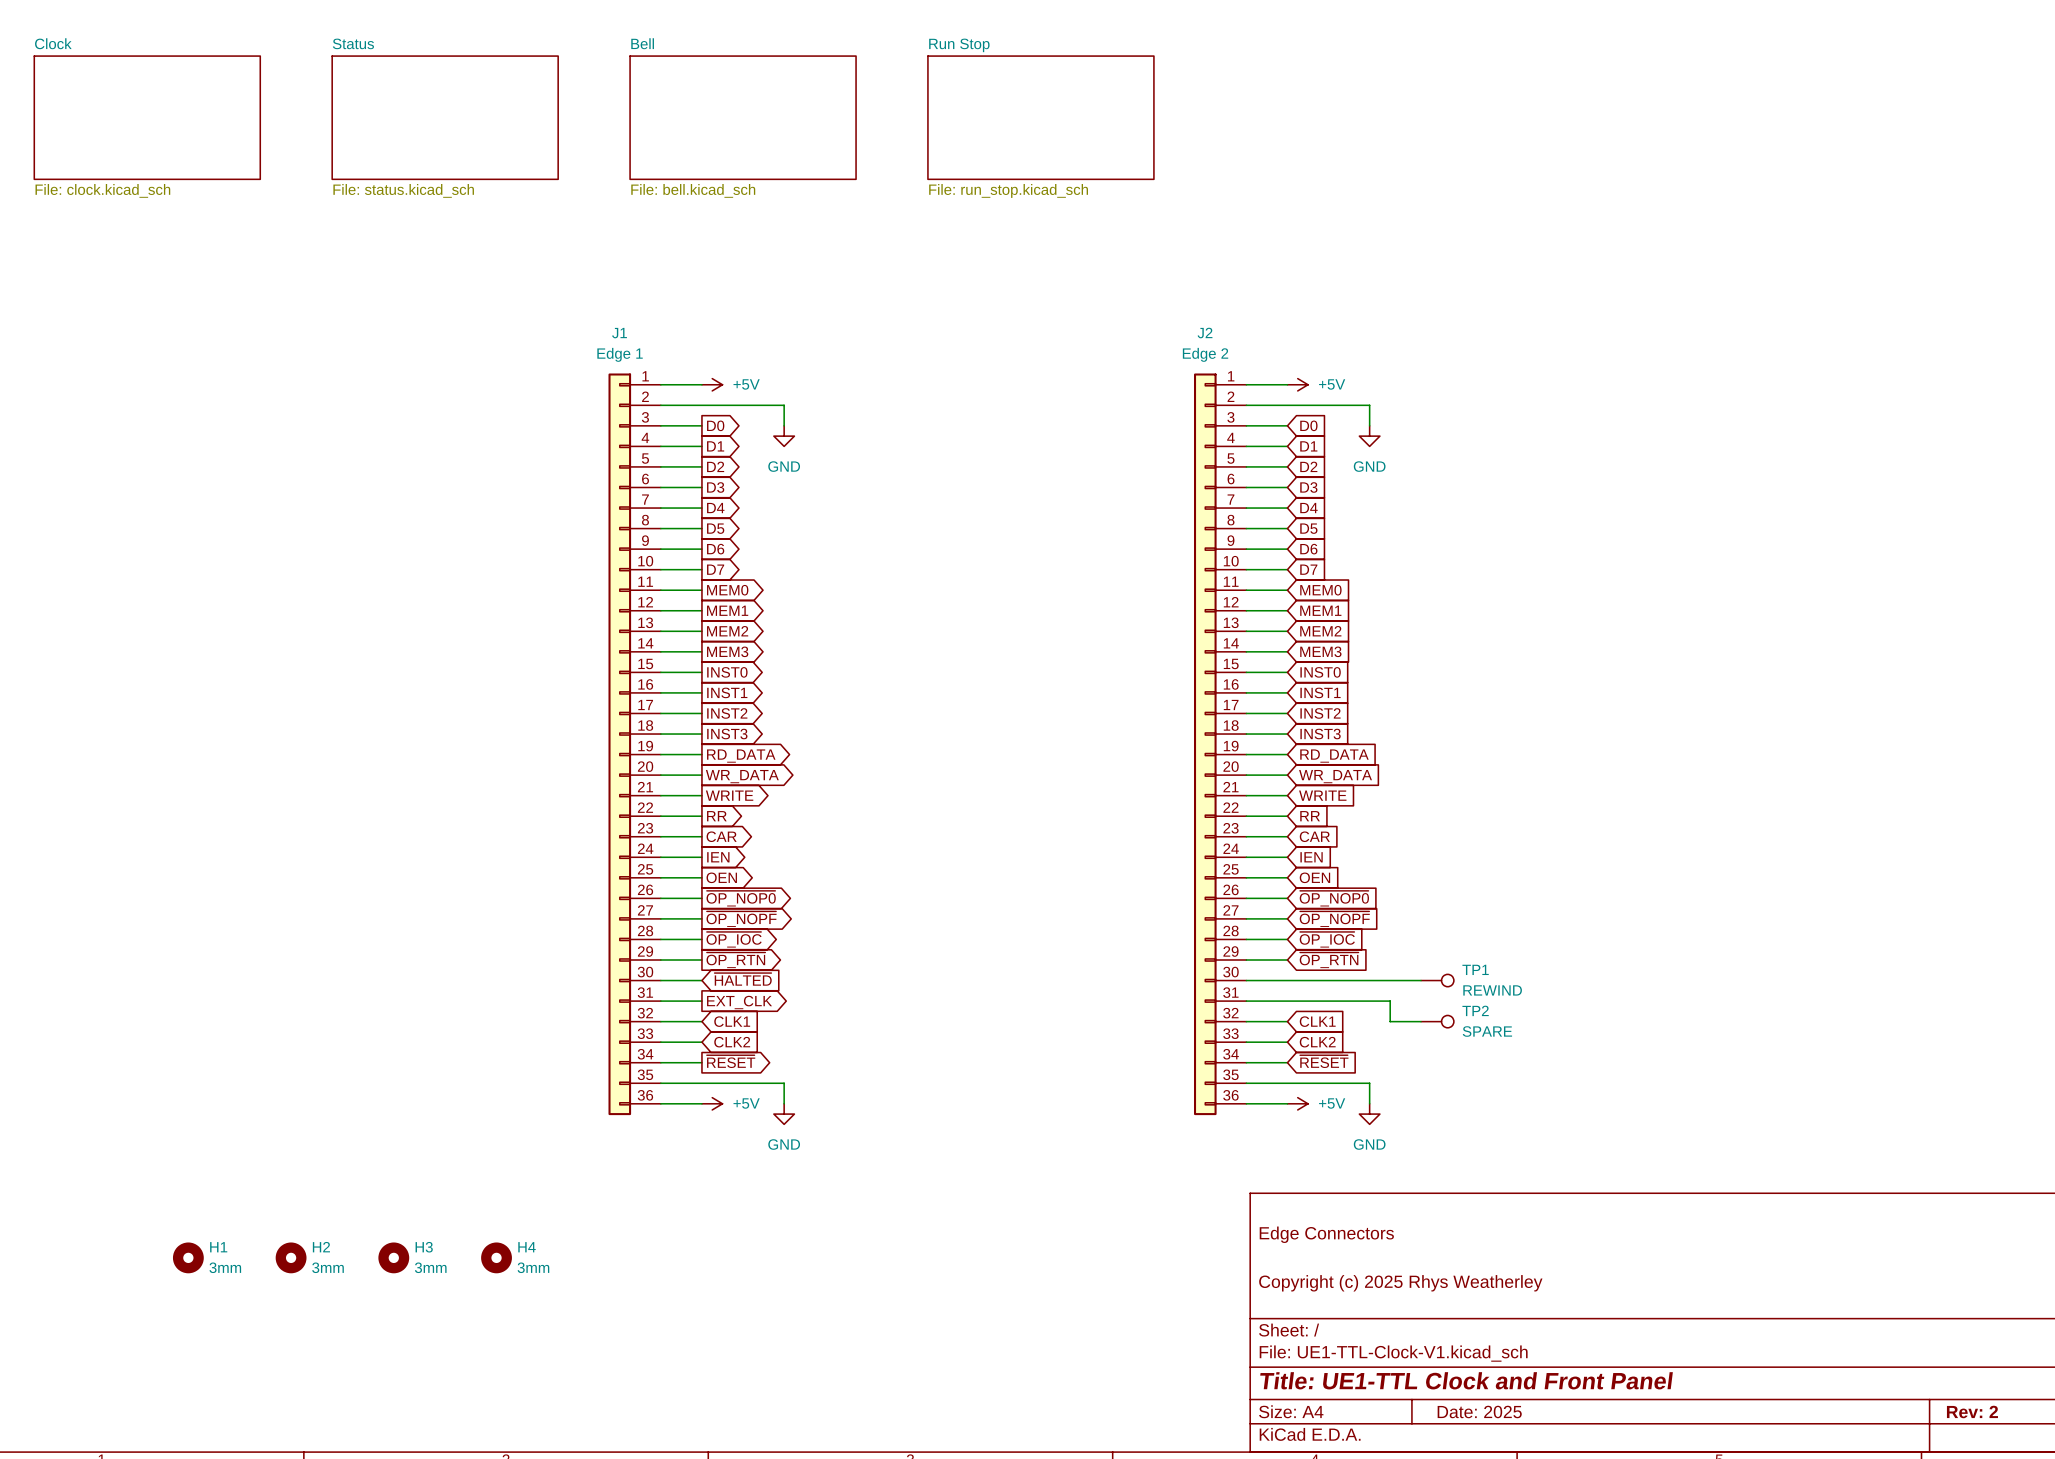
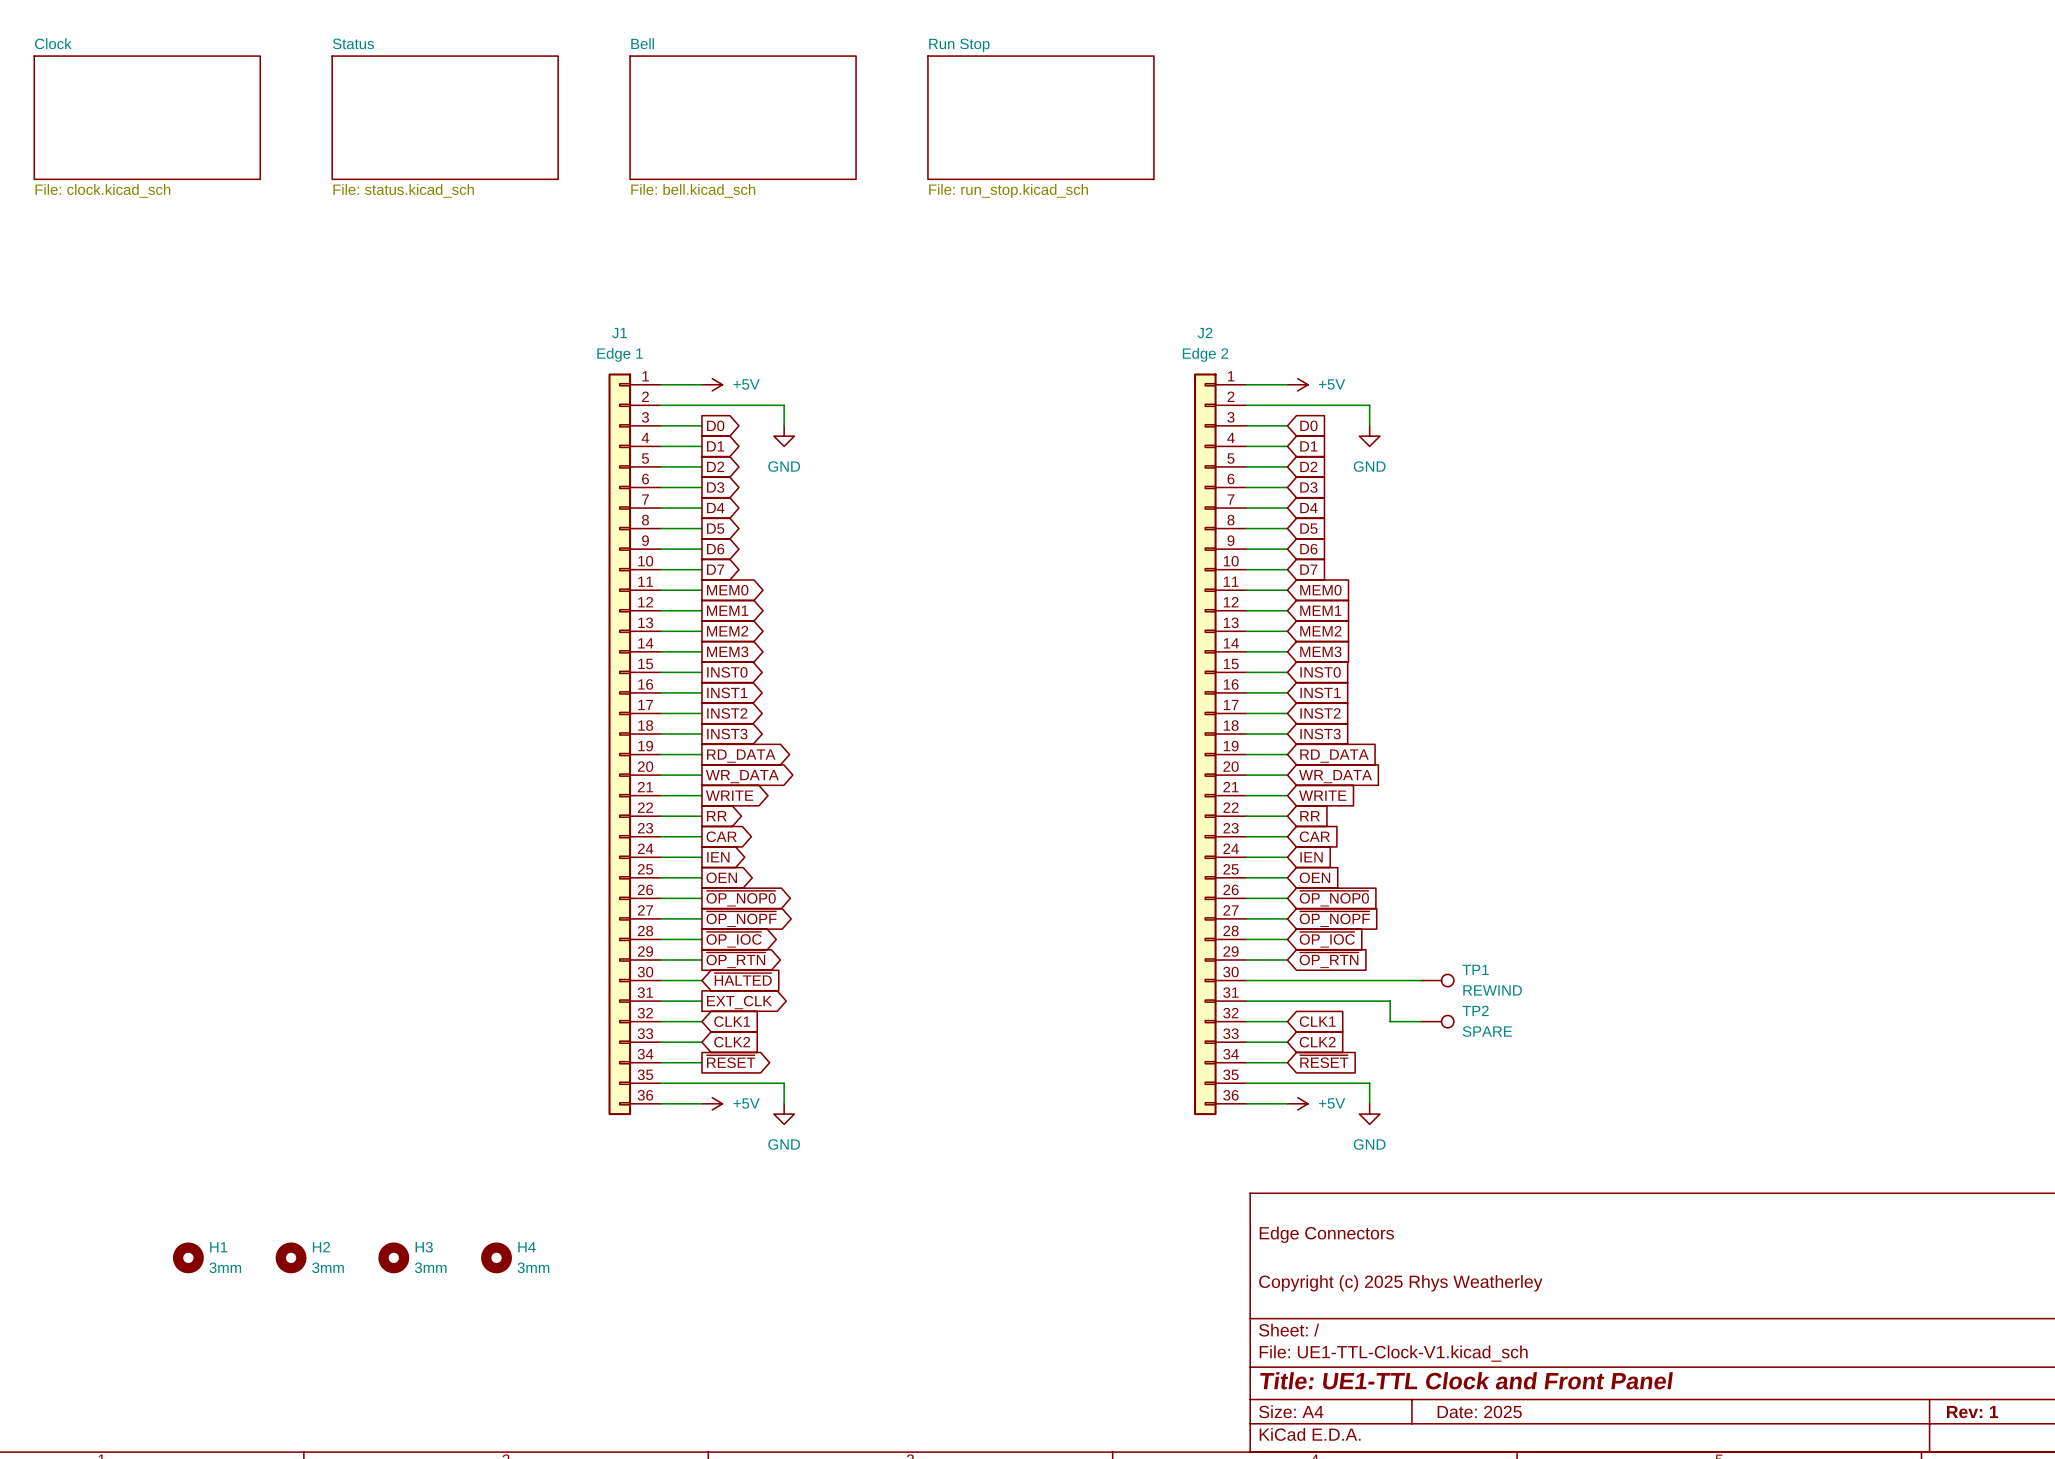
title block: Rev: 2 (1972, 1411) -> Rev: 1 (1972, 1412)

